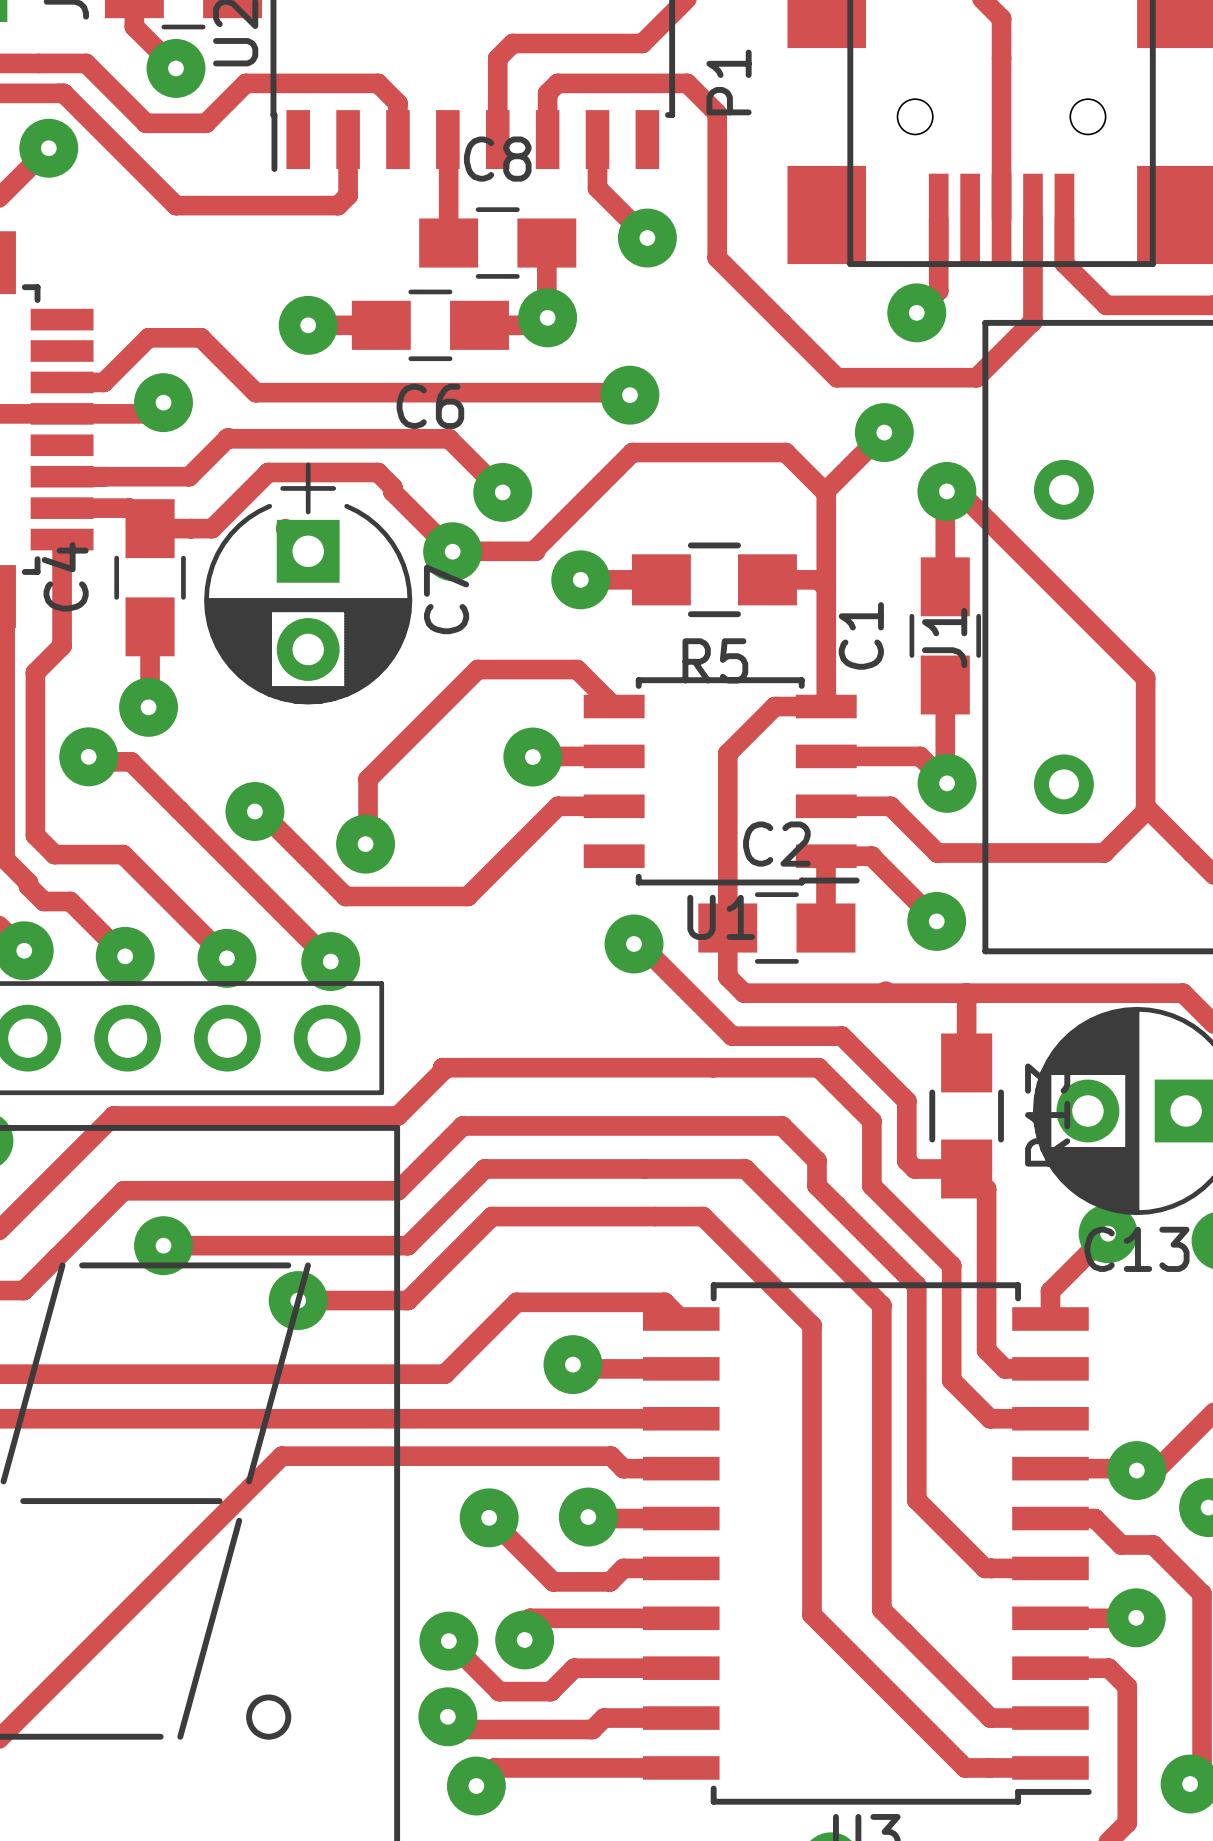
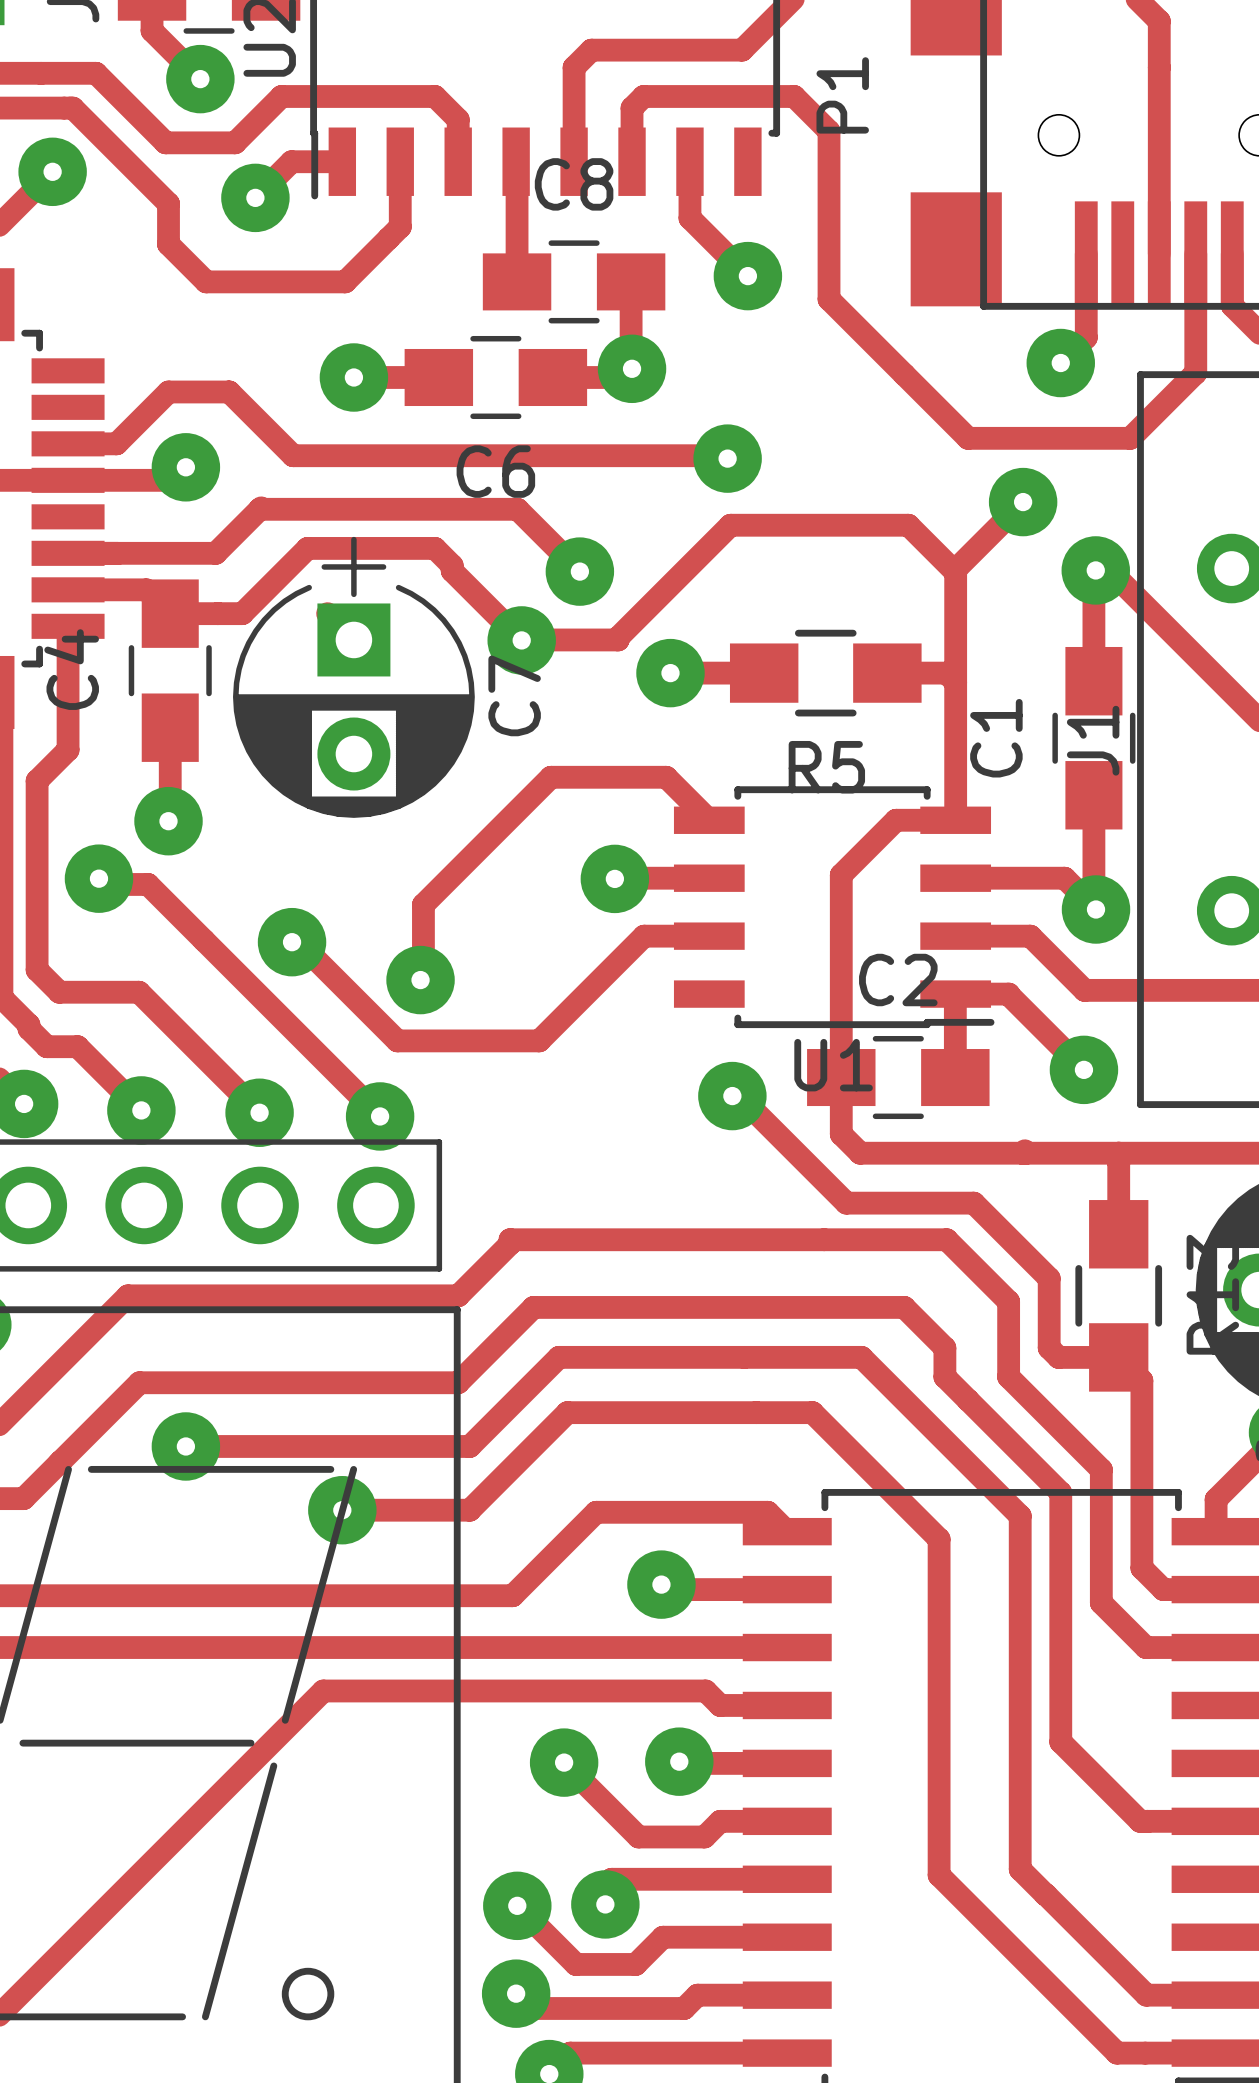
track: (63, 93) (175, 205) (338, 205) -> (70, 108) (72, 108) (168, 203) (168, 244) (206, 281) (345, 281) (388, 238)
track: none -> (342, 161) (291, 161) (255, 197)
via: none -> (255, 197)

